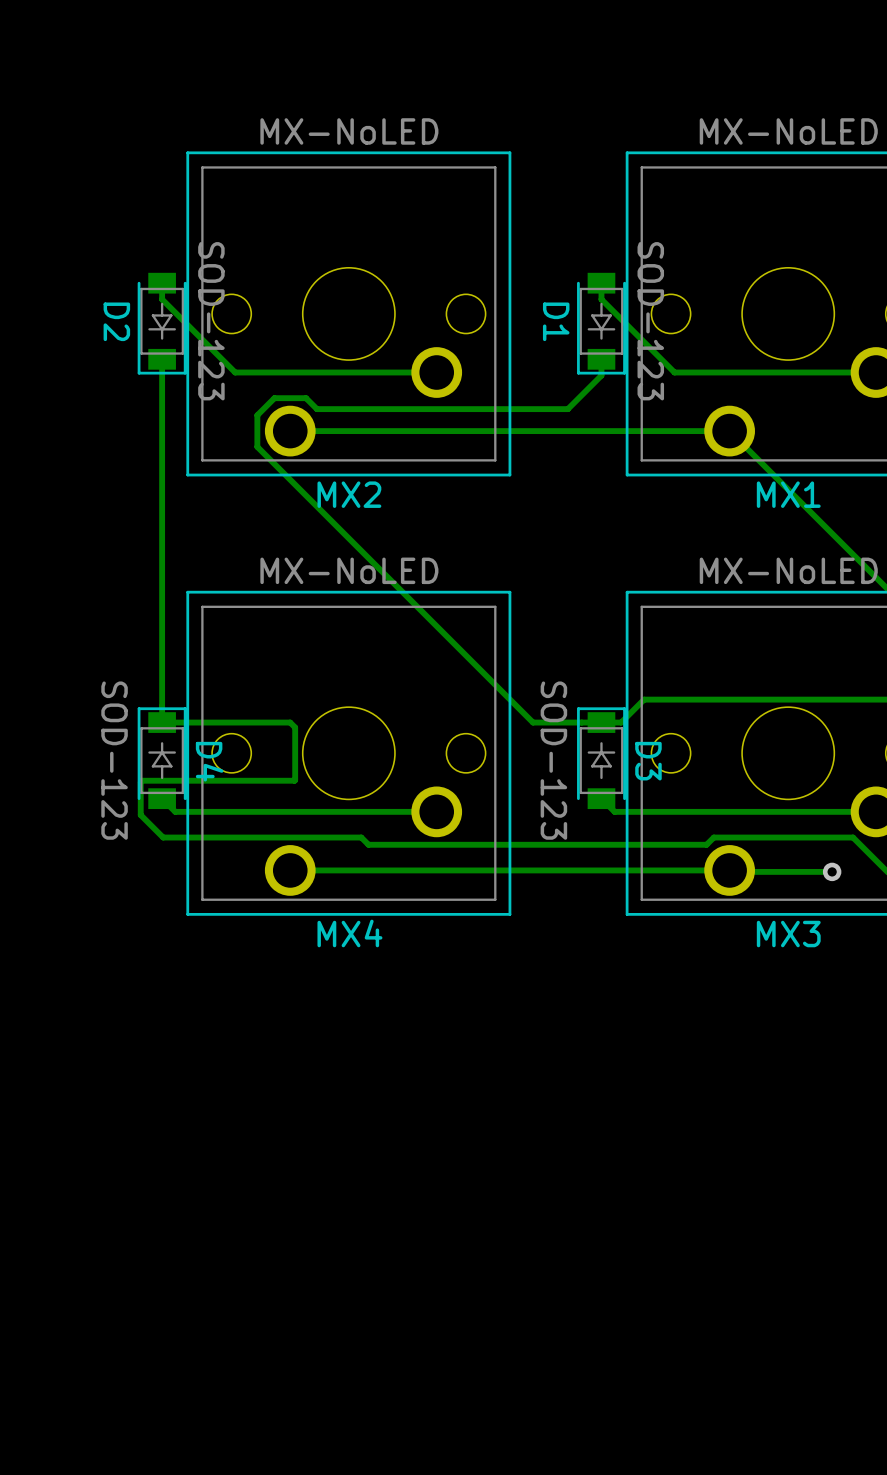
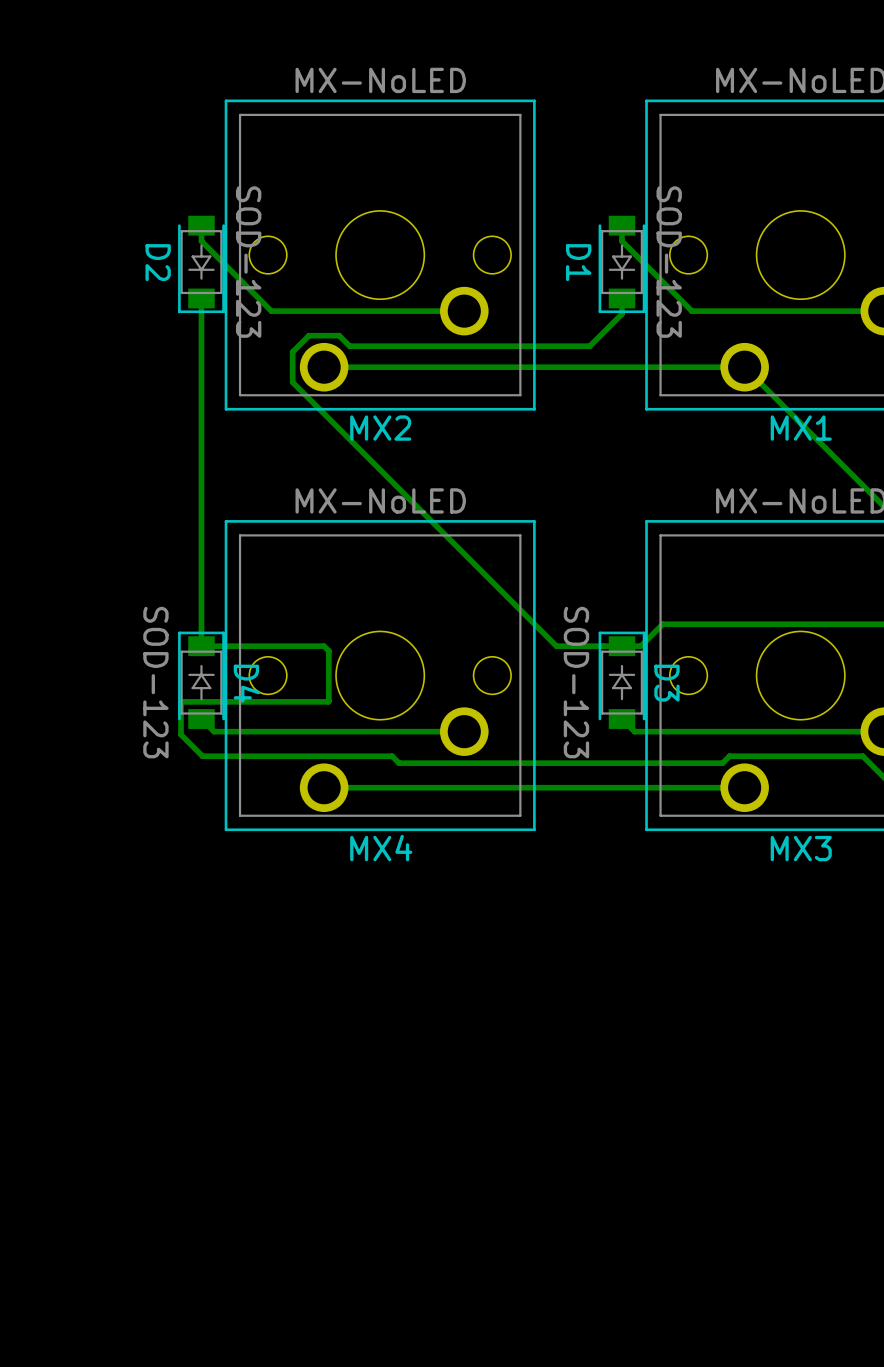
track: (729, 870) (832, 871) -> none
via: (832, 871) -> none

